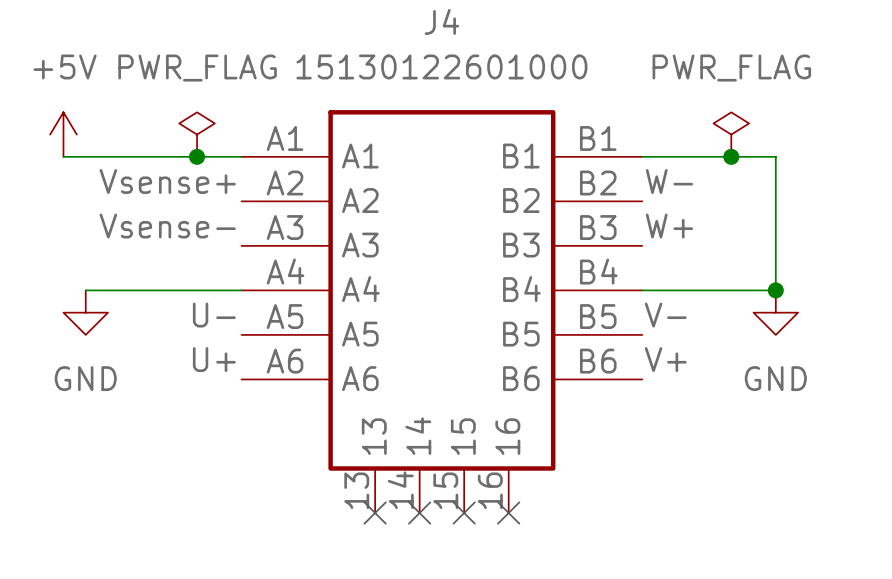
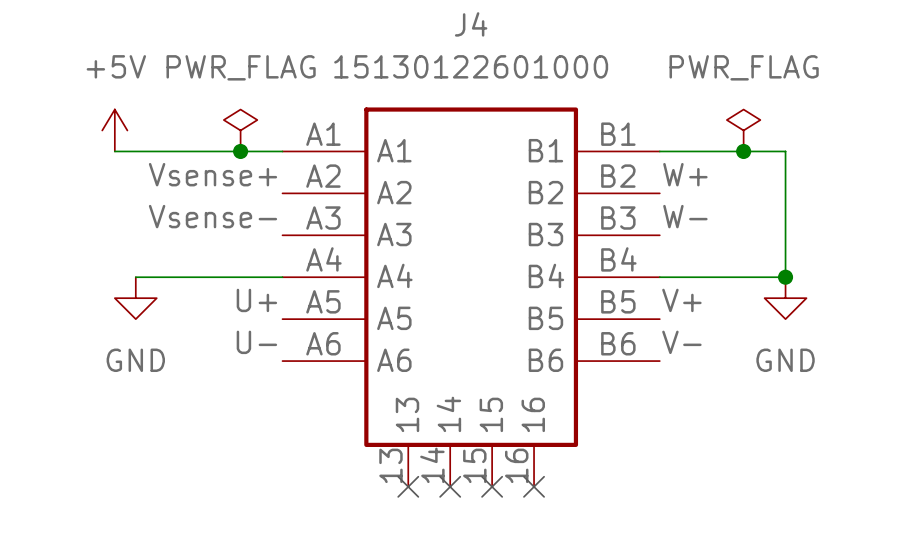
label: W- (669, 181) -> W+ (685, 174)
label: W+ (669, 226) -> W- (685, 216)
label: U- (214, 315) -> U+ (256, 300)
label: V- (665, 315) -> V+ (681, 300)
label: U+ (214, 359) -> U- (256, 342)
label: V+ (665, 359) -> V- (681, 342)

